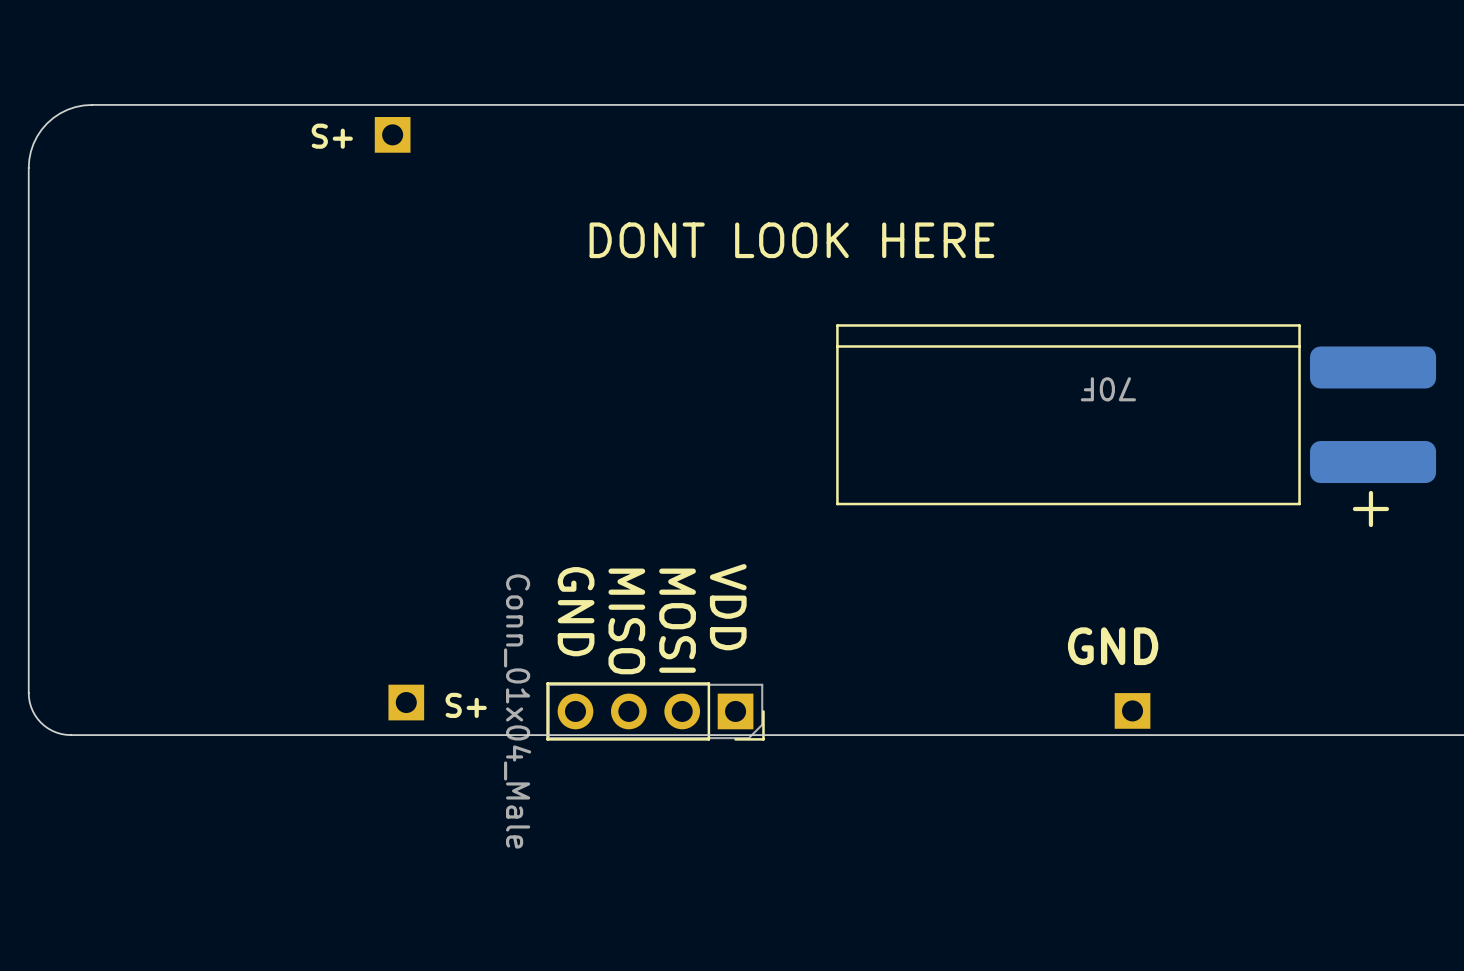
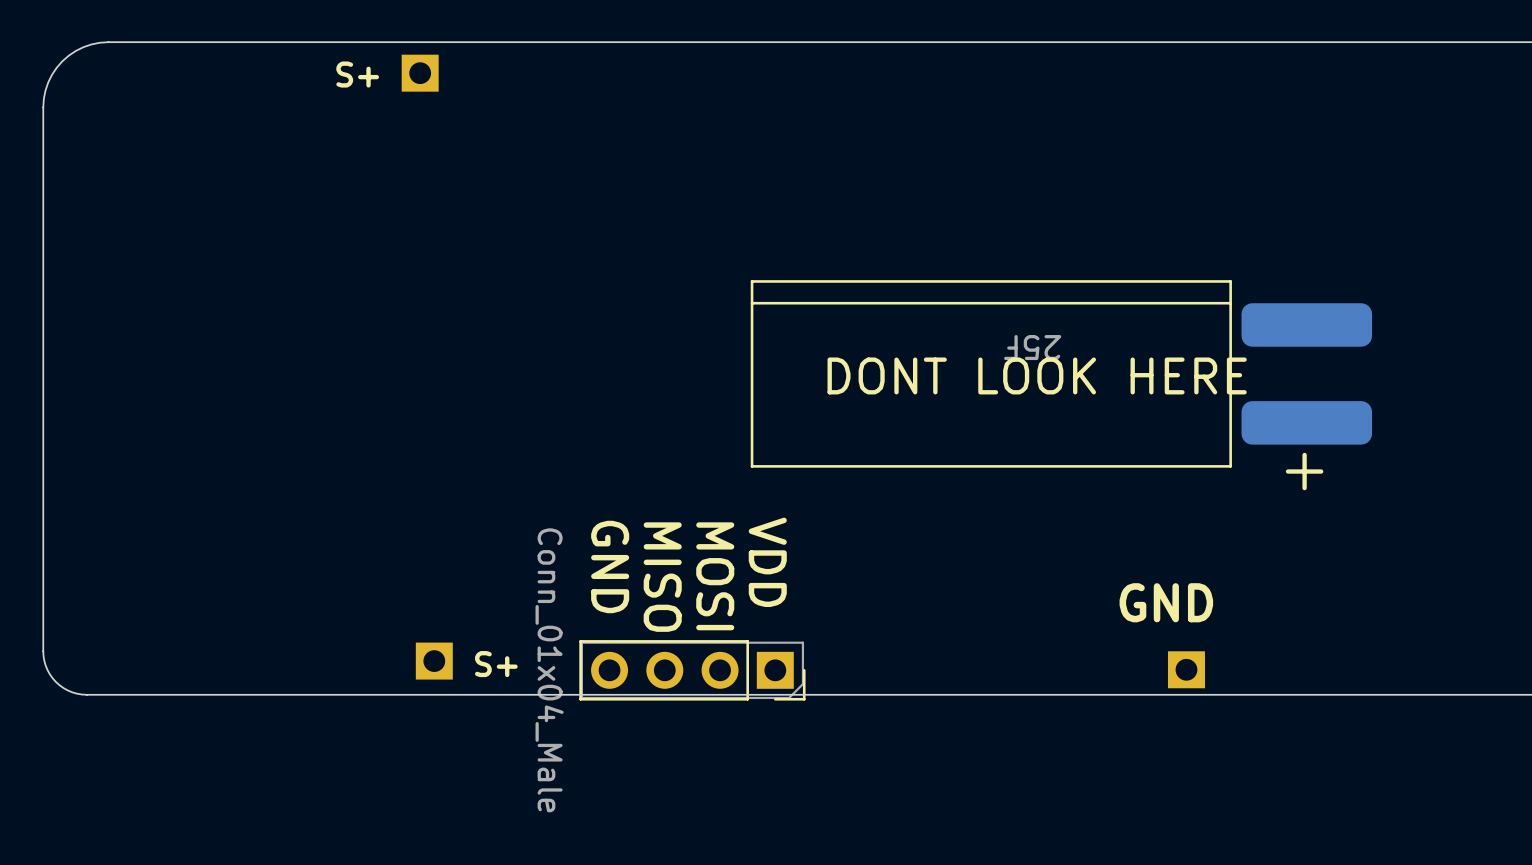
text position: DONT LOOK HERE (791, 240) -> DONT LOOK HERE (1037, 375)
part: 70F (1136, 414) -> none
part: none -> 25F (1061, 373)

